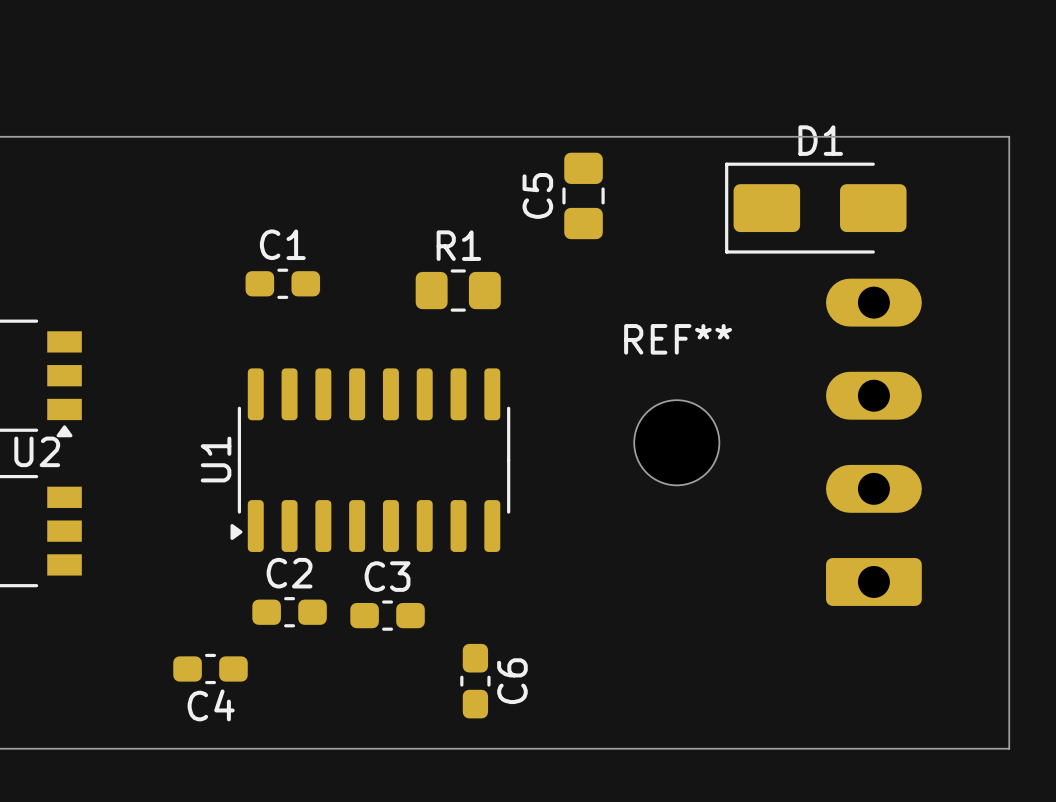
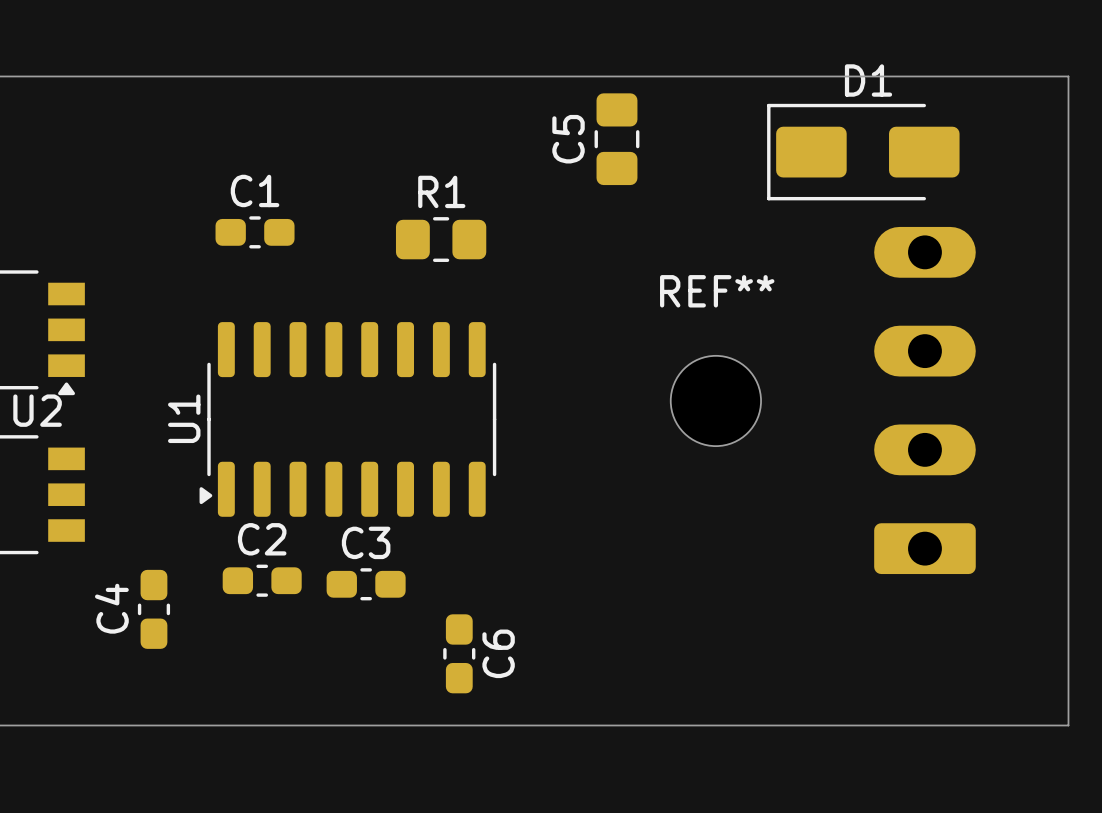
C1 position: (282, 283) -> (255, 232)
R1 position: (458, 290) -> (441, 239)
U1 position: (370, 460) -> (347, 419)
C2 position: (289, 612) -> (262, 580)
C3 position: (387, 615) -> (366, 584)
C4 rotation: 0° (210, 668) -> 90° clockwise (153, 609)
C4 position: (210, 668) -> (153, 609)
C6 position: (475, 681) -> (459, 653)

